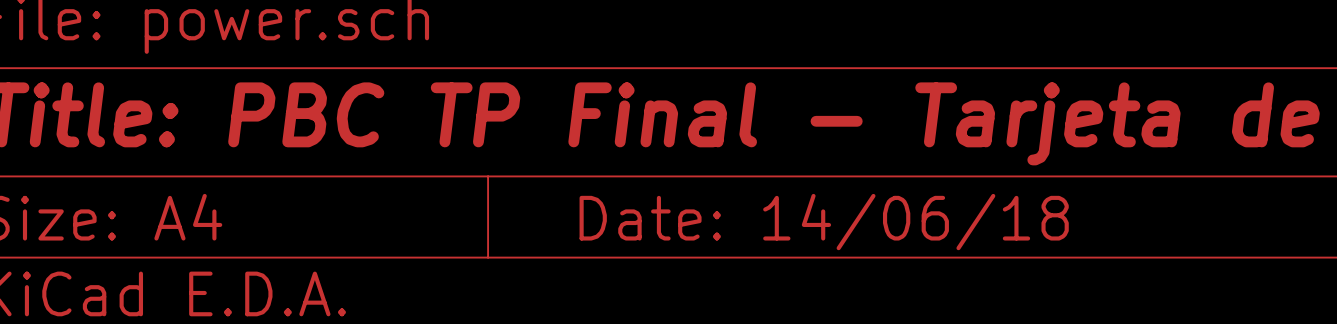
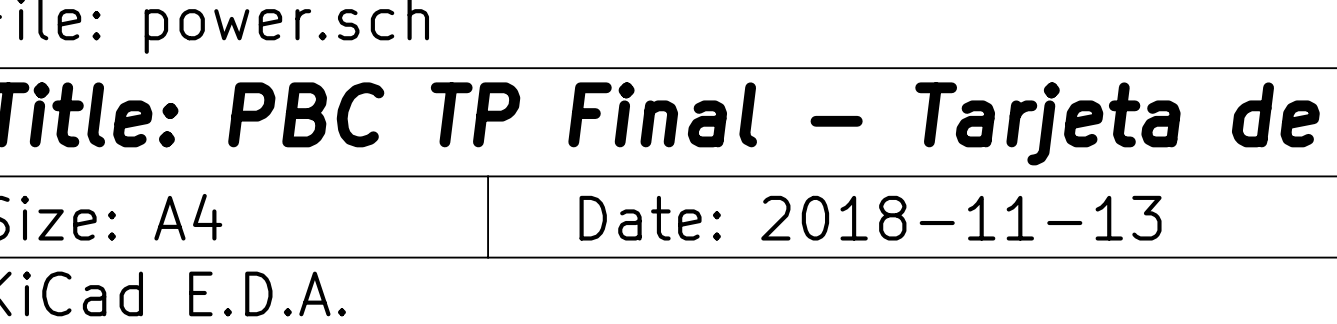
title block: Date: 14/06/18 (824, 222) -> Date: 2018-11-13 (870, 218)

